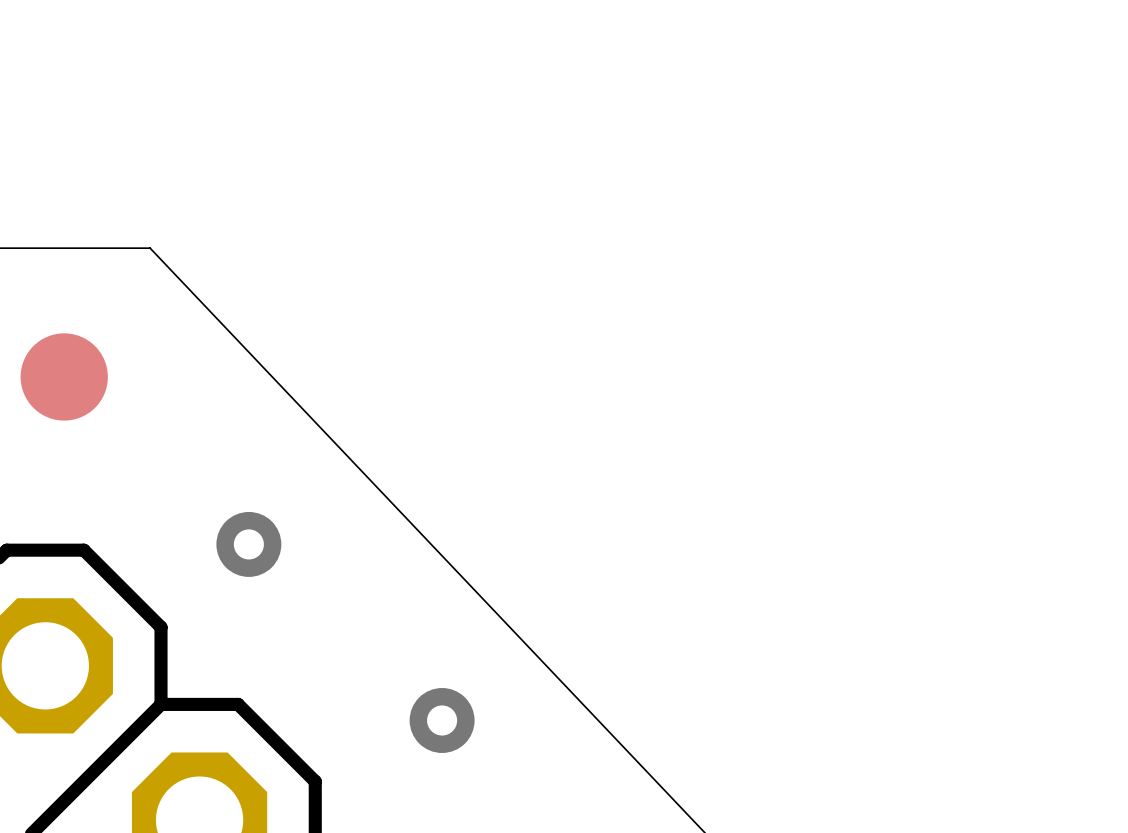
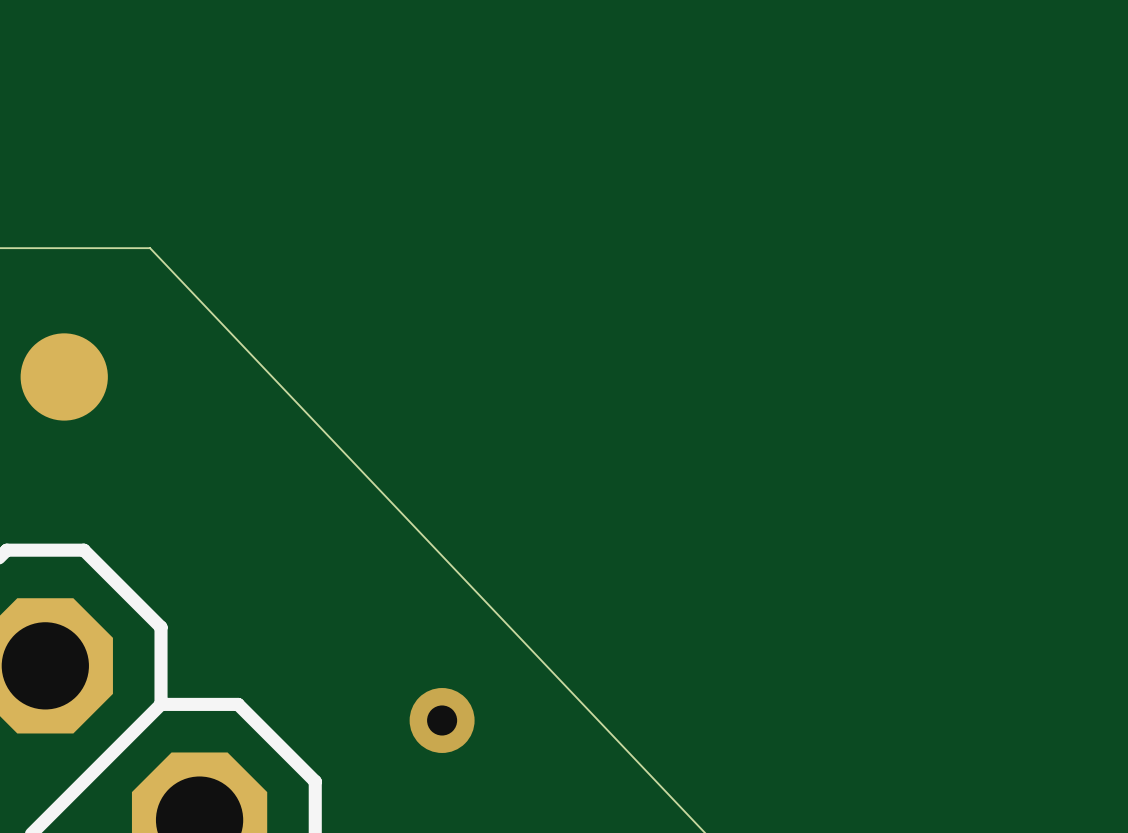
via: (248, 544) -> none

